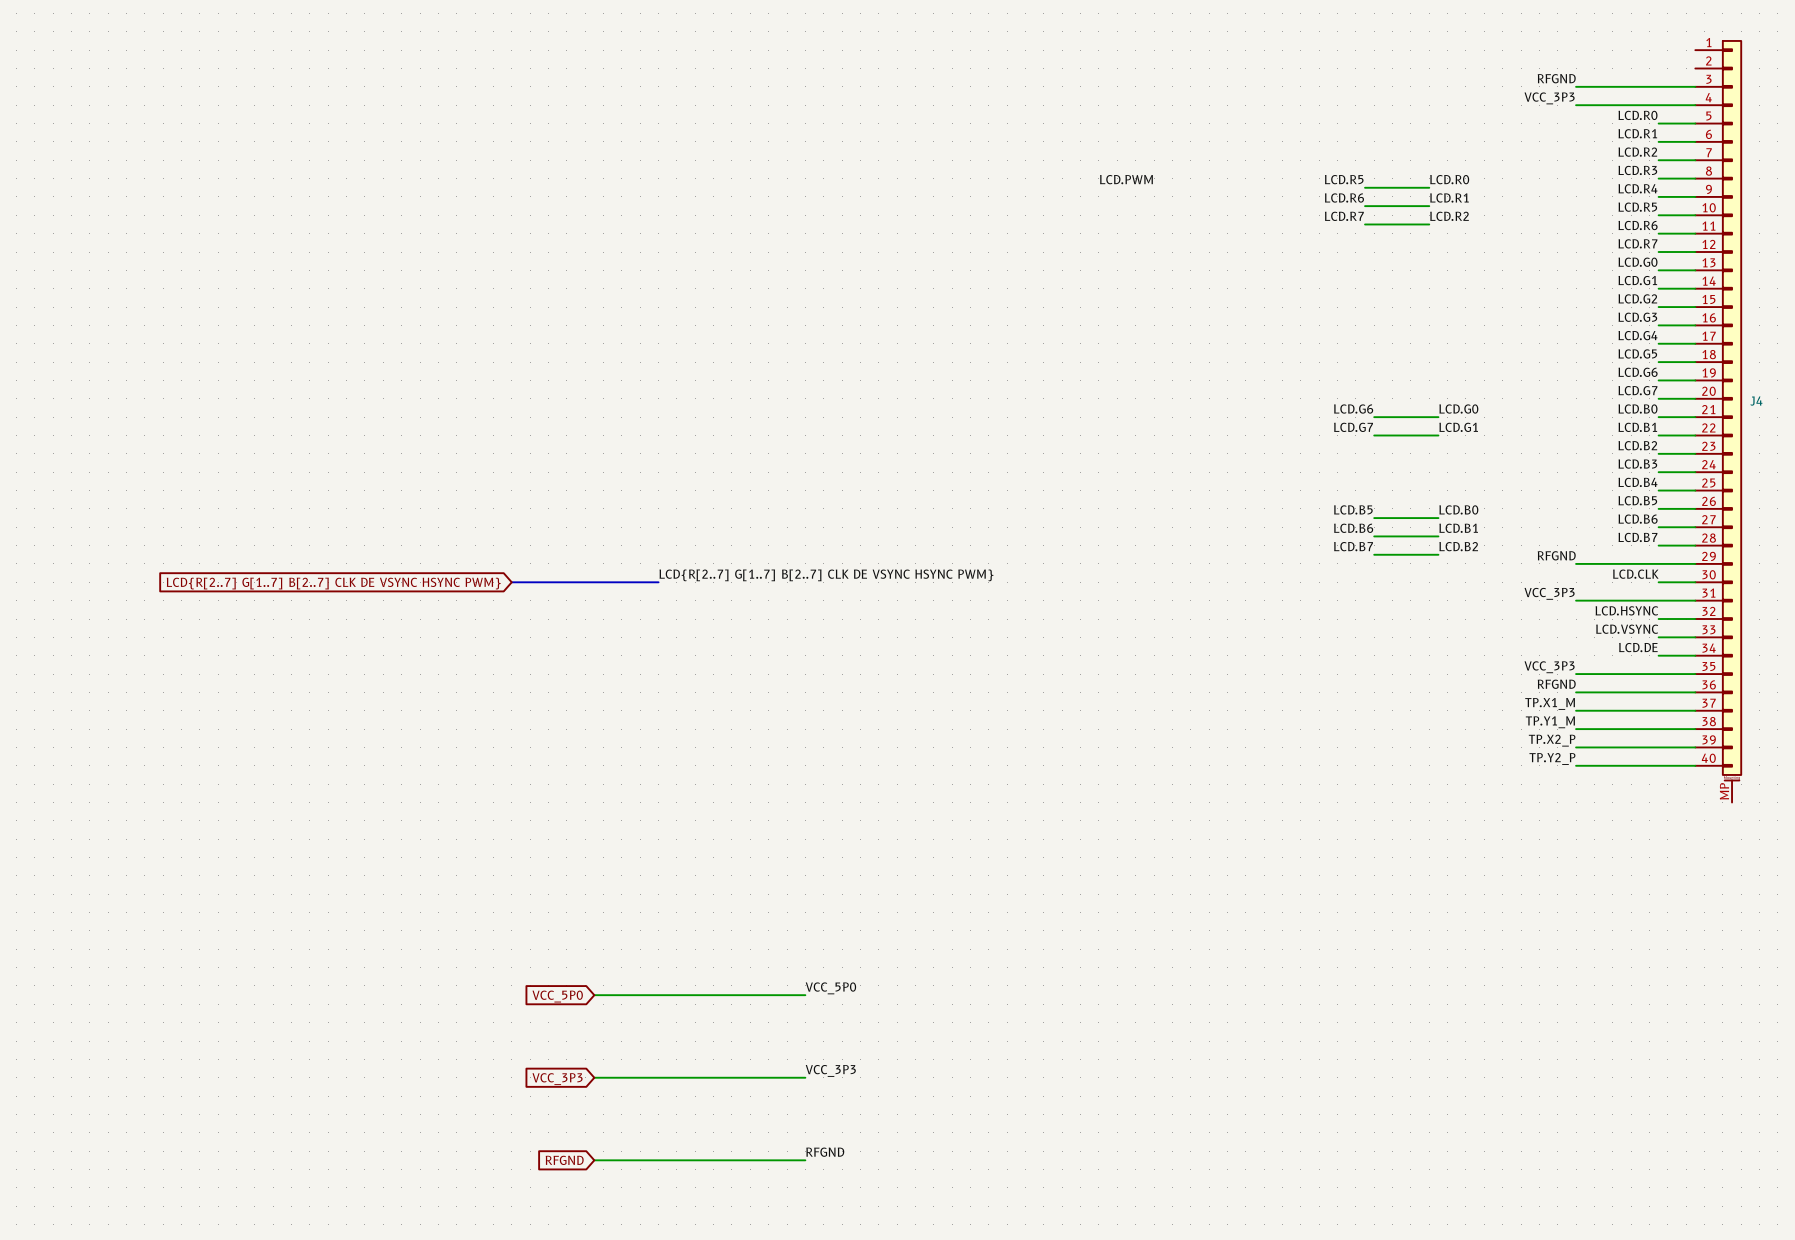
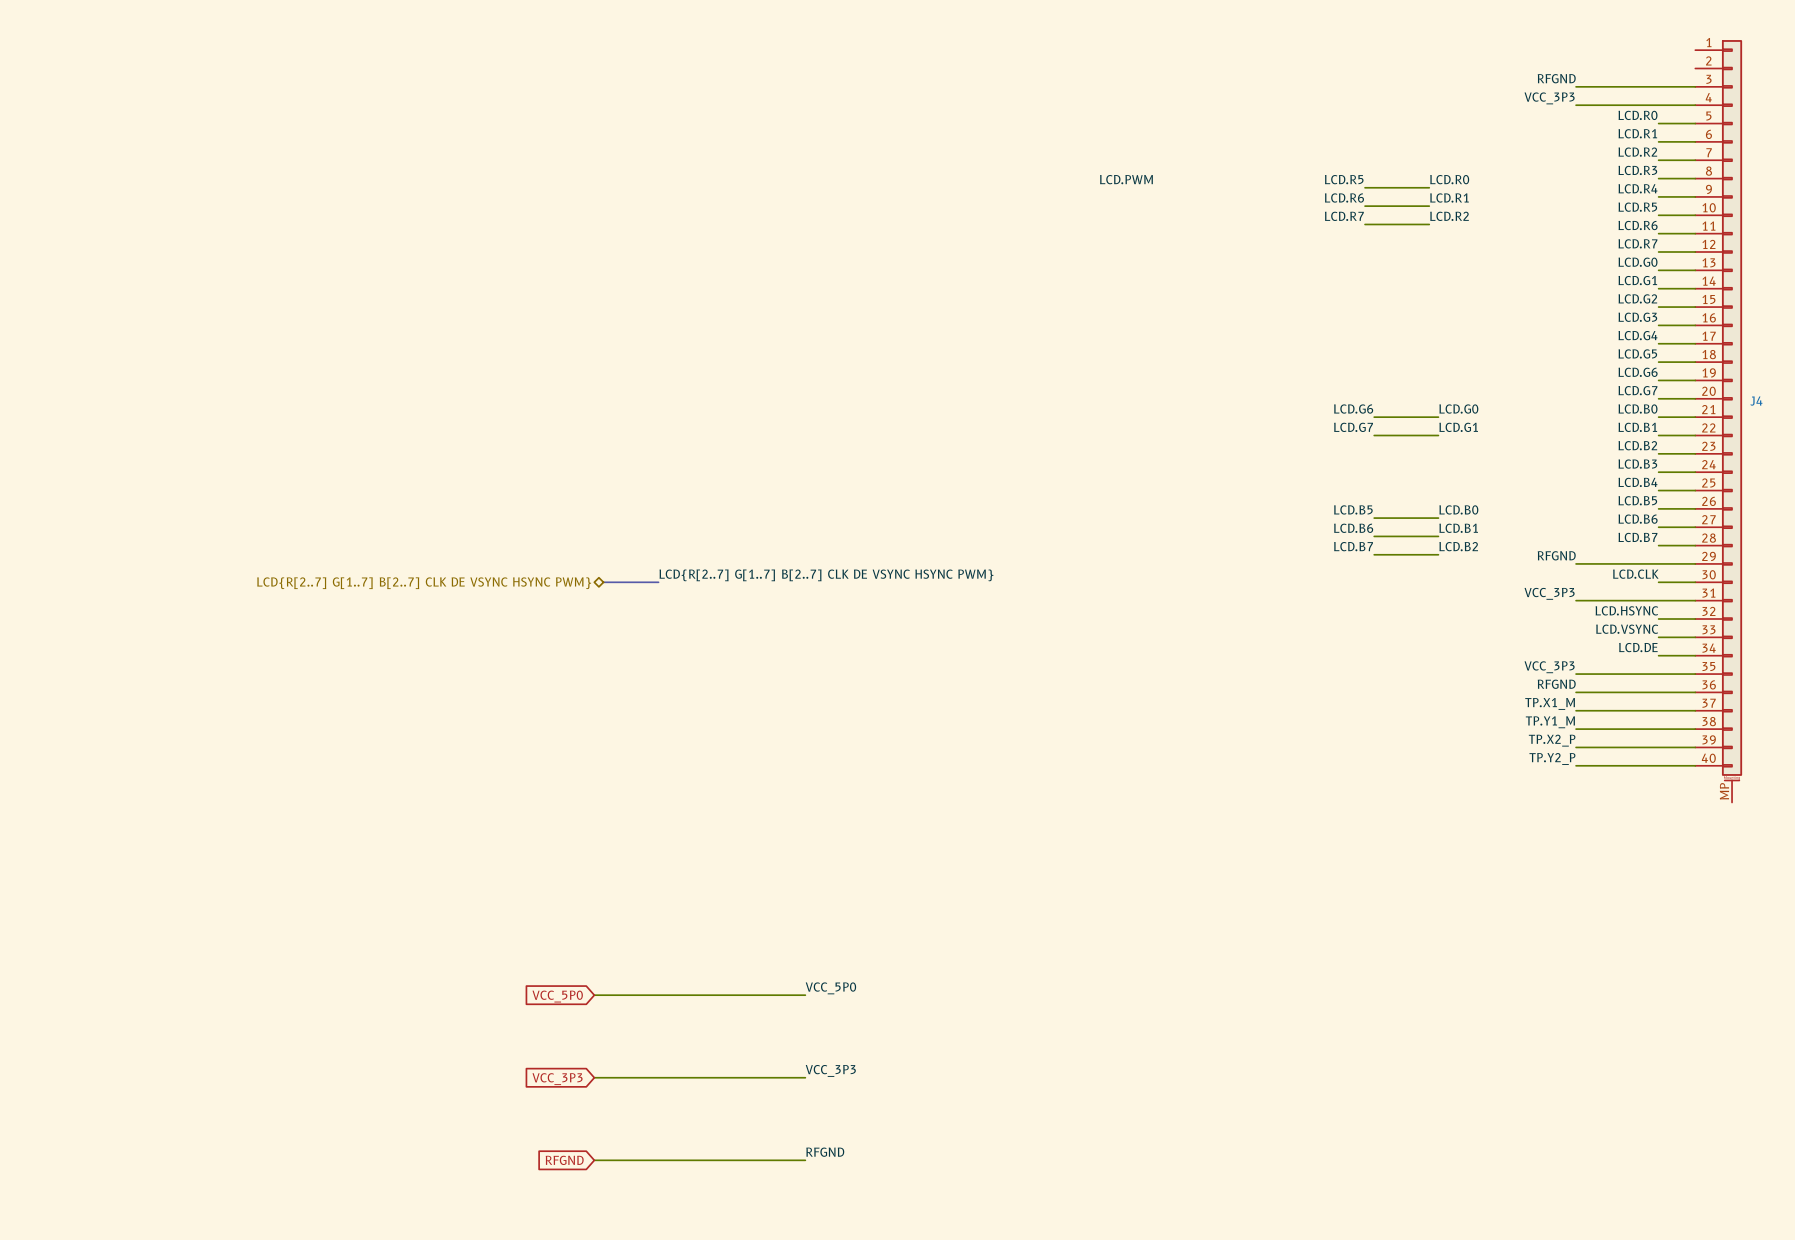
bus: (511, 582) (603, 582) -> none
global label: LCD{R[2..7] G[1..7] B[2..7] CLK DE VSYNC HSYNC PWM} (333, 583) -> none
hierarchical label: none -> LCD{R[2..7] G[1..7] B[2..7] CLK DE VSYNC HSYNC PWM} (424, 583)

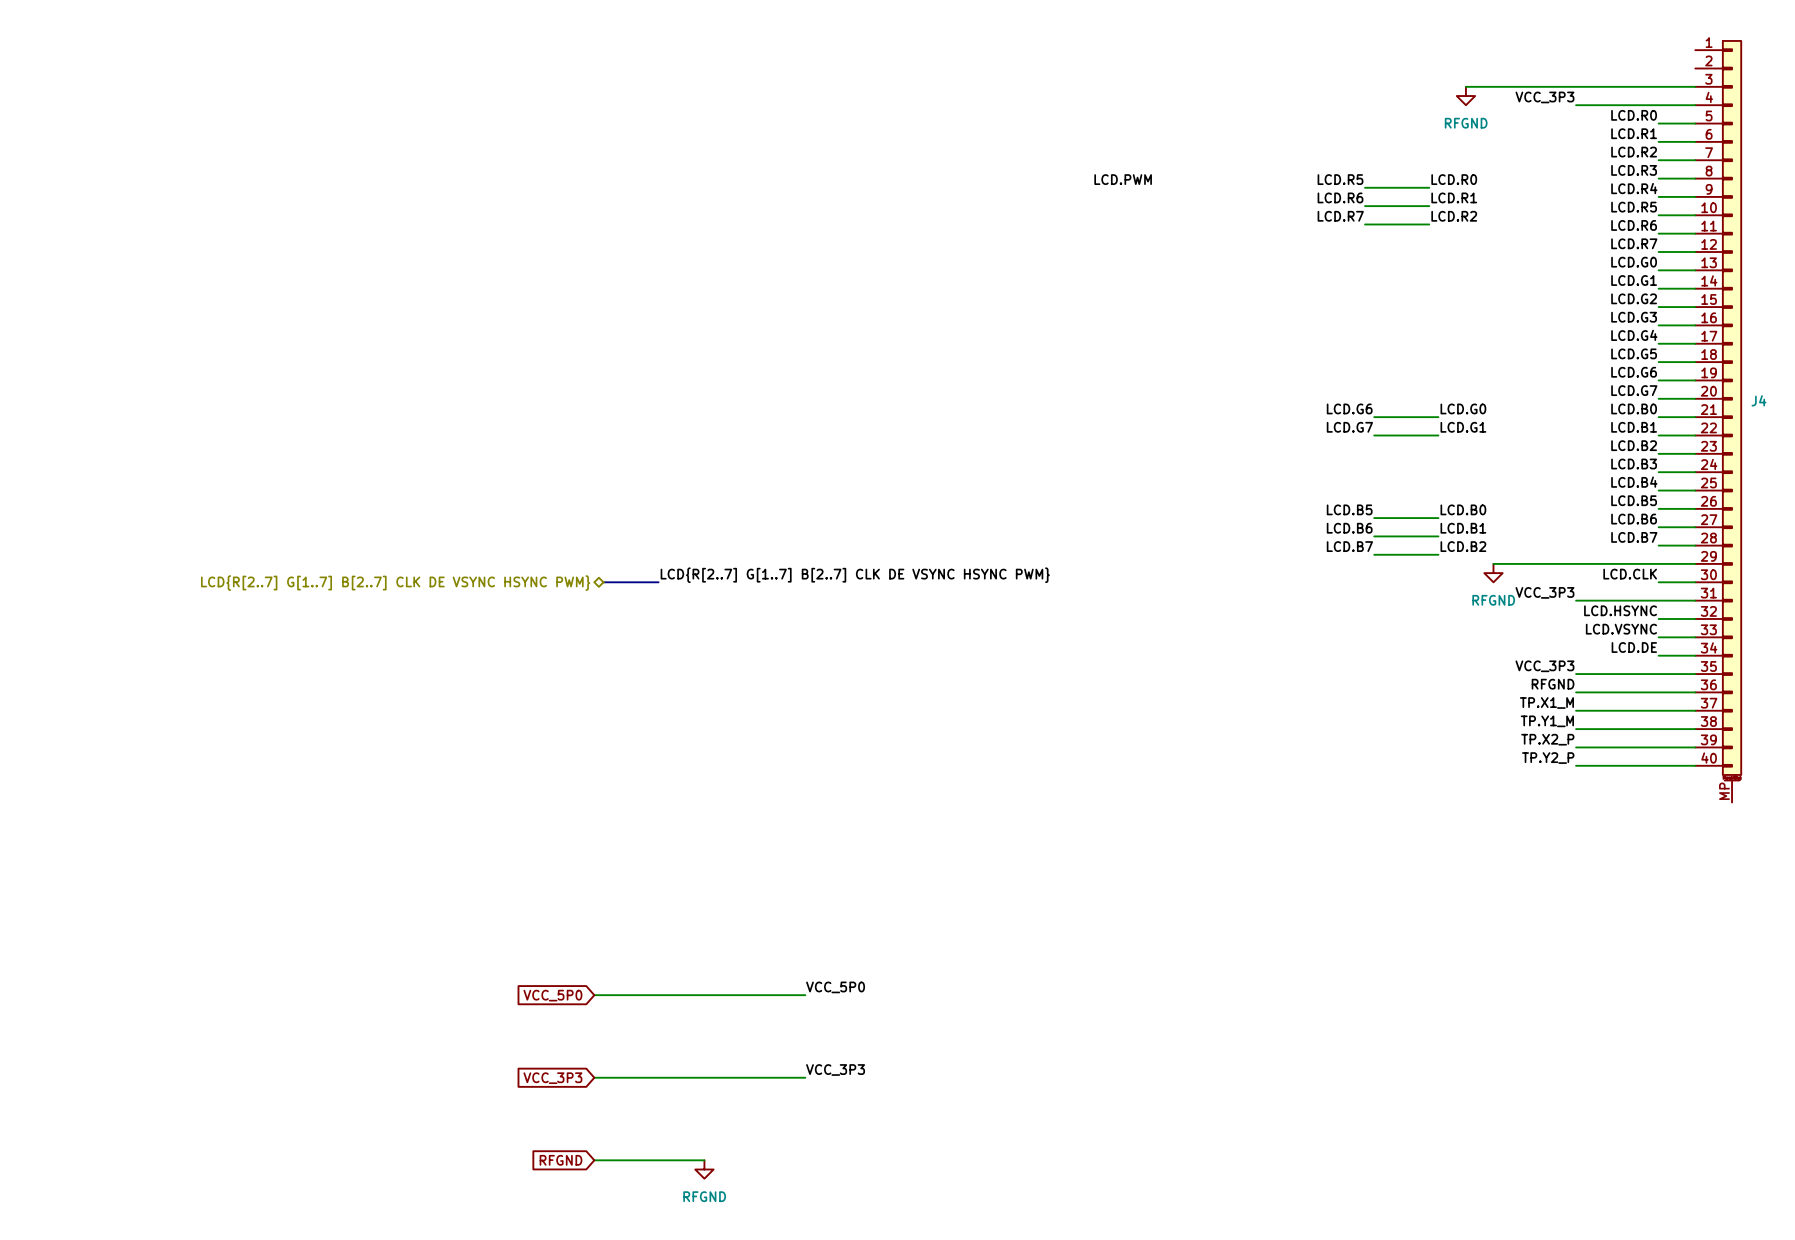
label: RFGND (1556, 78) -> none
wire: none -> (1465, 86) (1576, 86)
power symbol: none -> RFGND (1465, 96)
label: RFGND (1556, 555) -> none
wire: none -> (1493, 563) (1576, 563)
power symbol: none -> RFGND (1493, 573)
label: RFGND (825, 1152) -> none
wire: (704, 1160) (805, 1160) -> none
power symbol: none -> RFGND (704, 1169)

